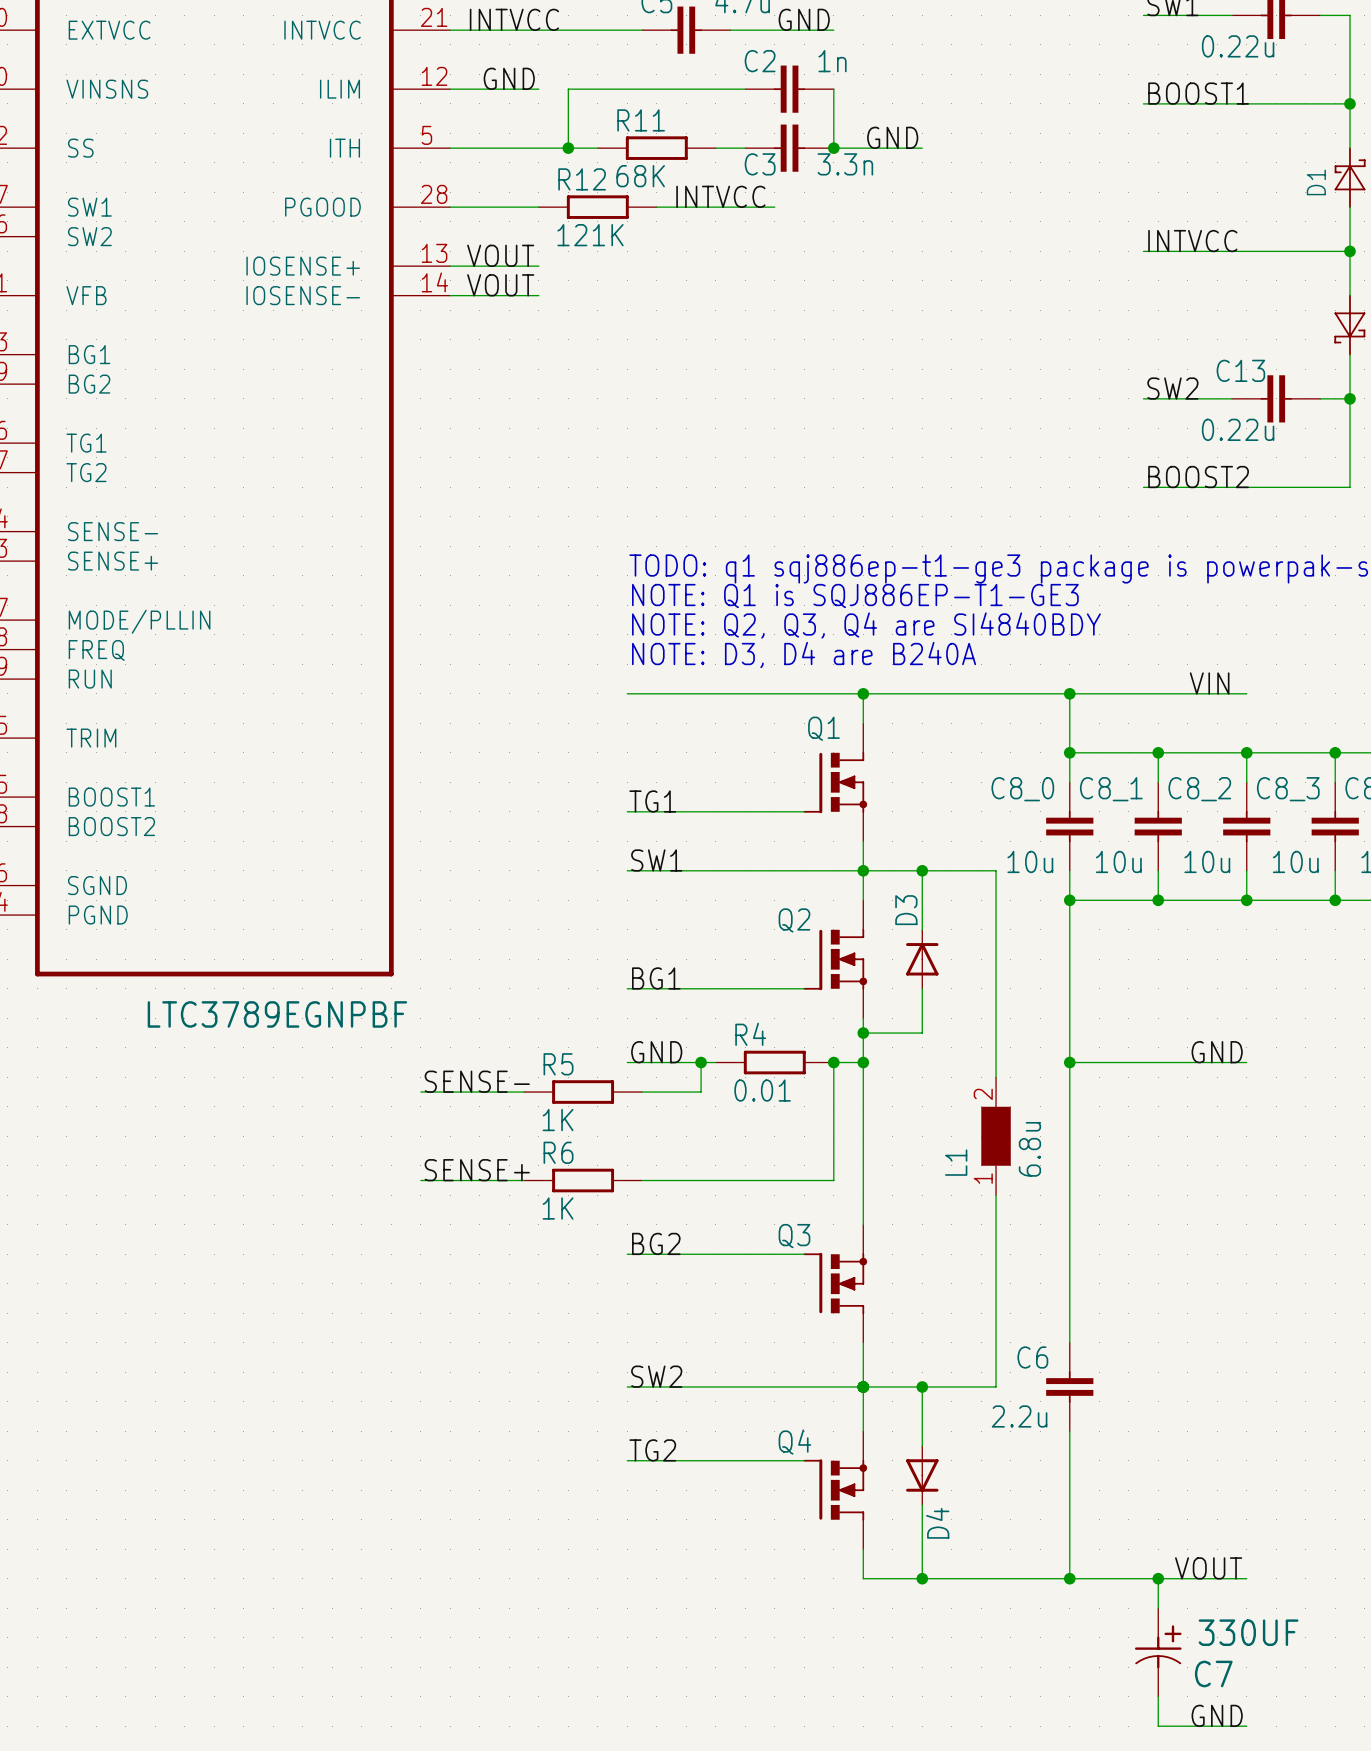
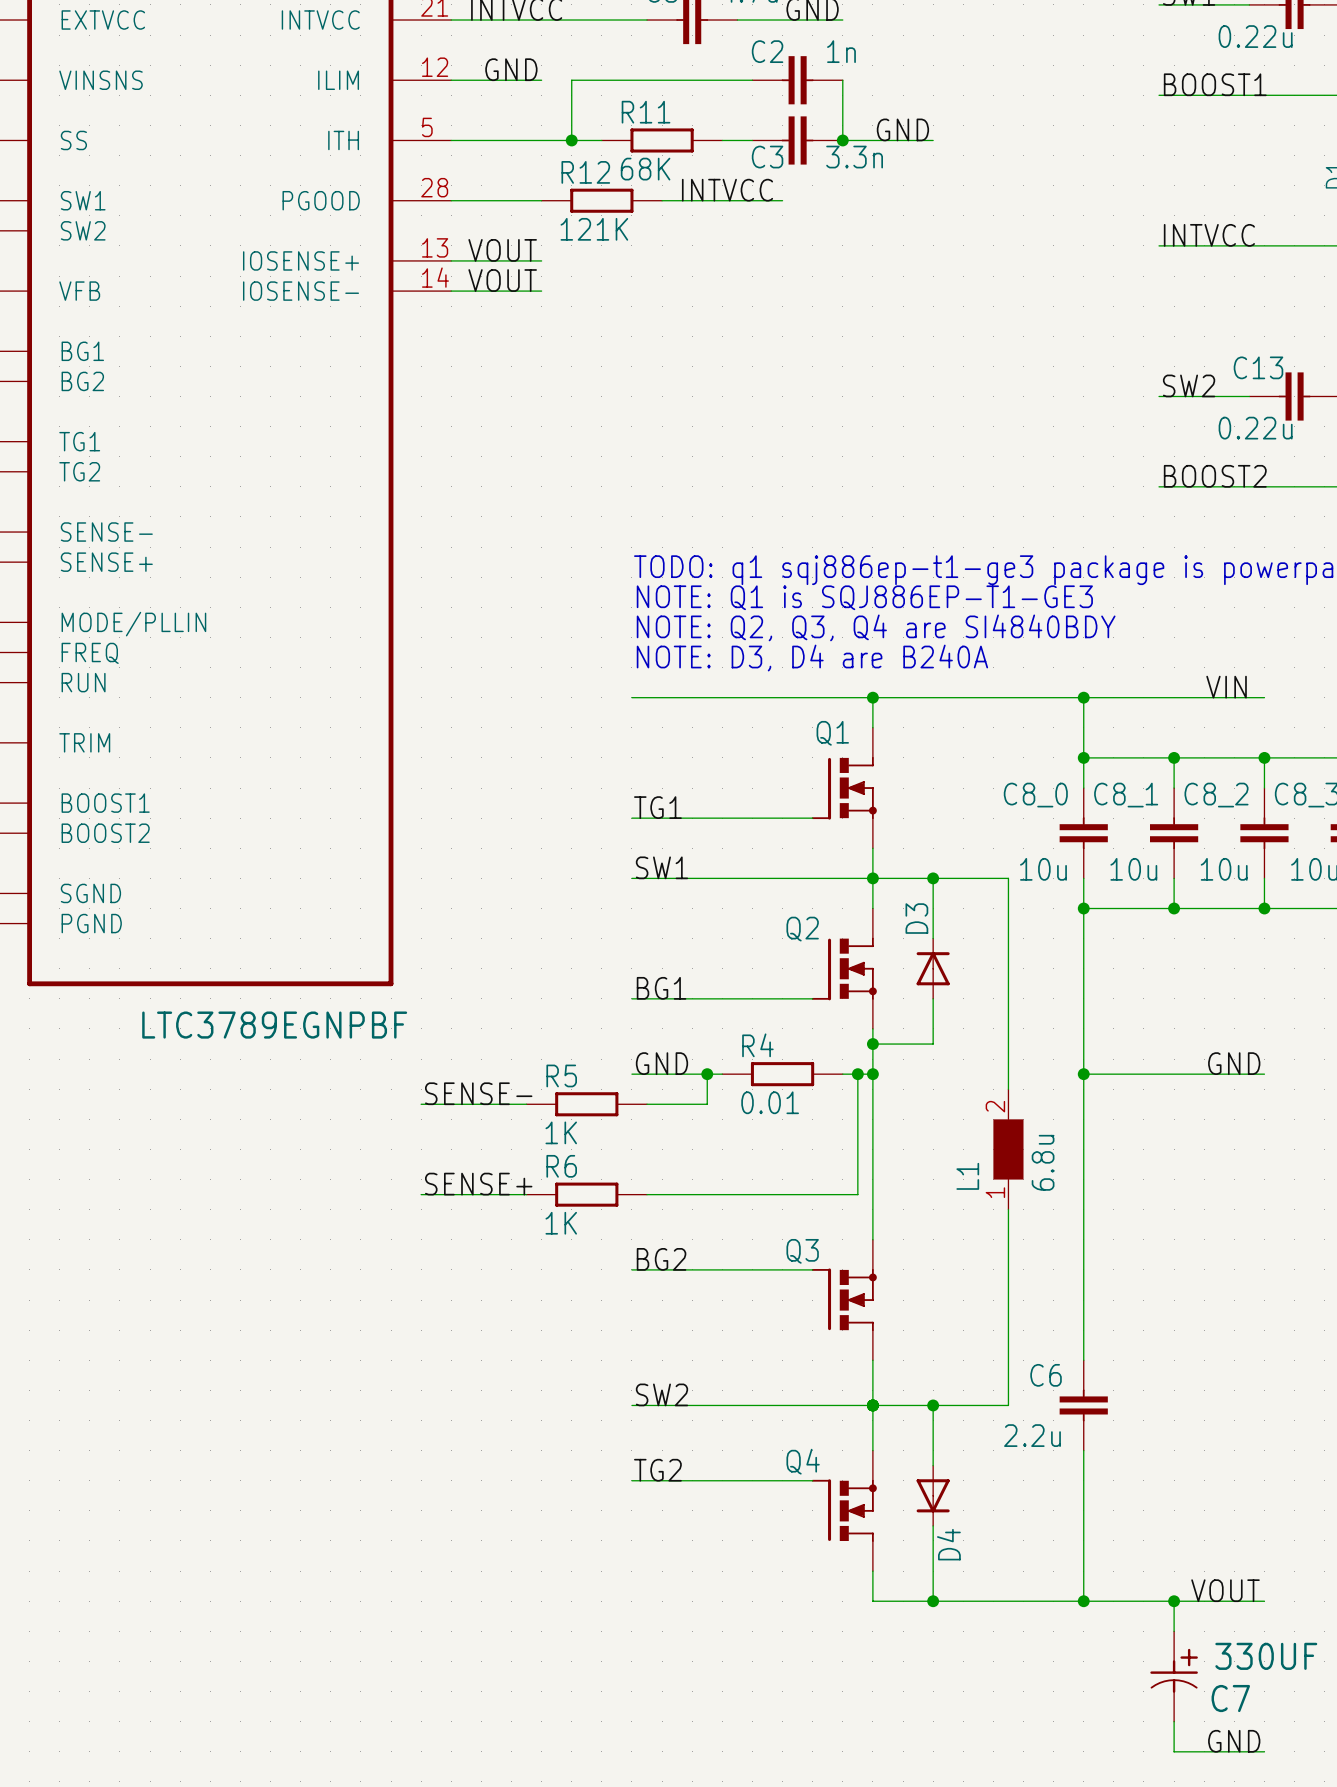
wire: (833, 1062) (833, 1180) -> (857, 1074) (857, 1194) (842, 1194)
junction position: (833, 1062) -> (857, 1074)

